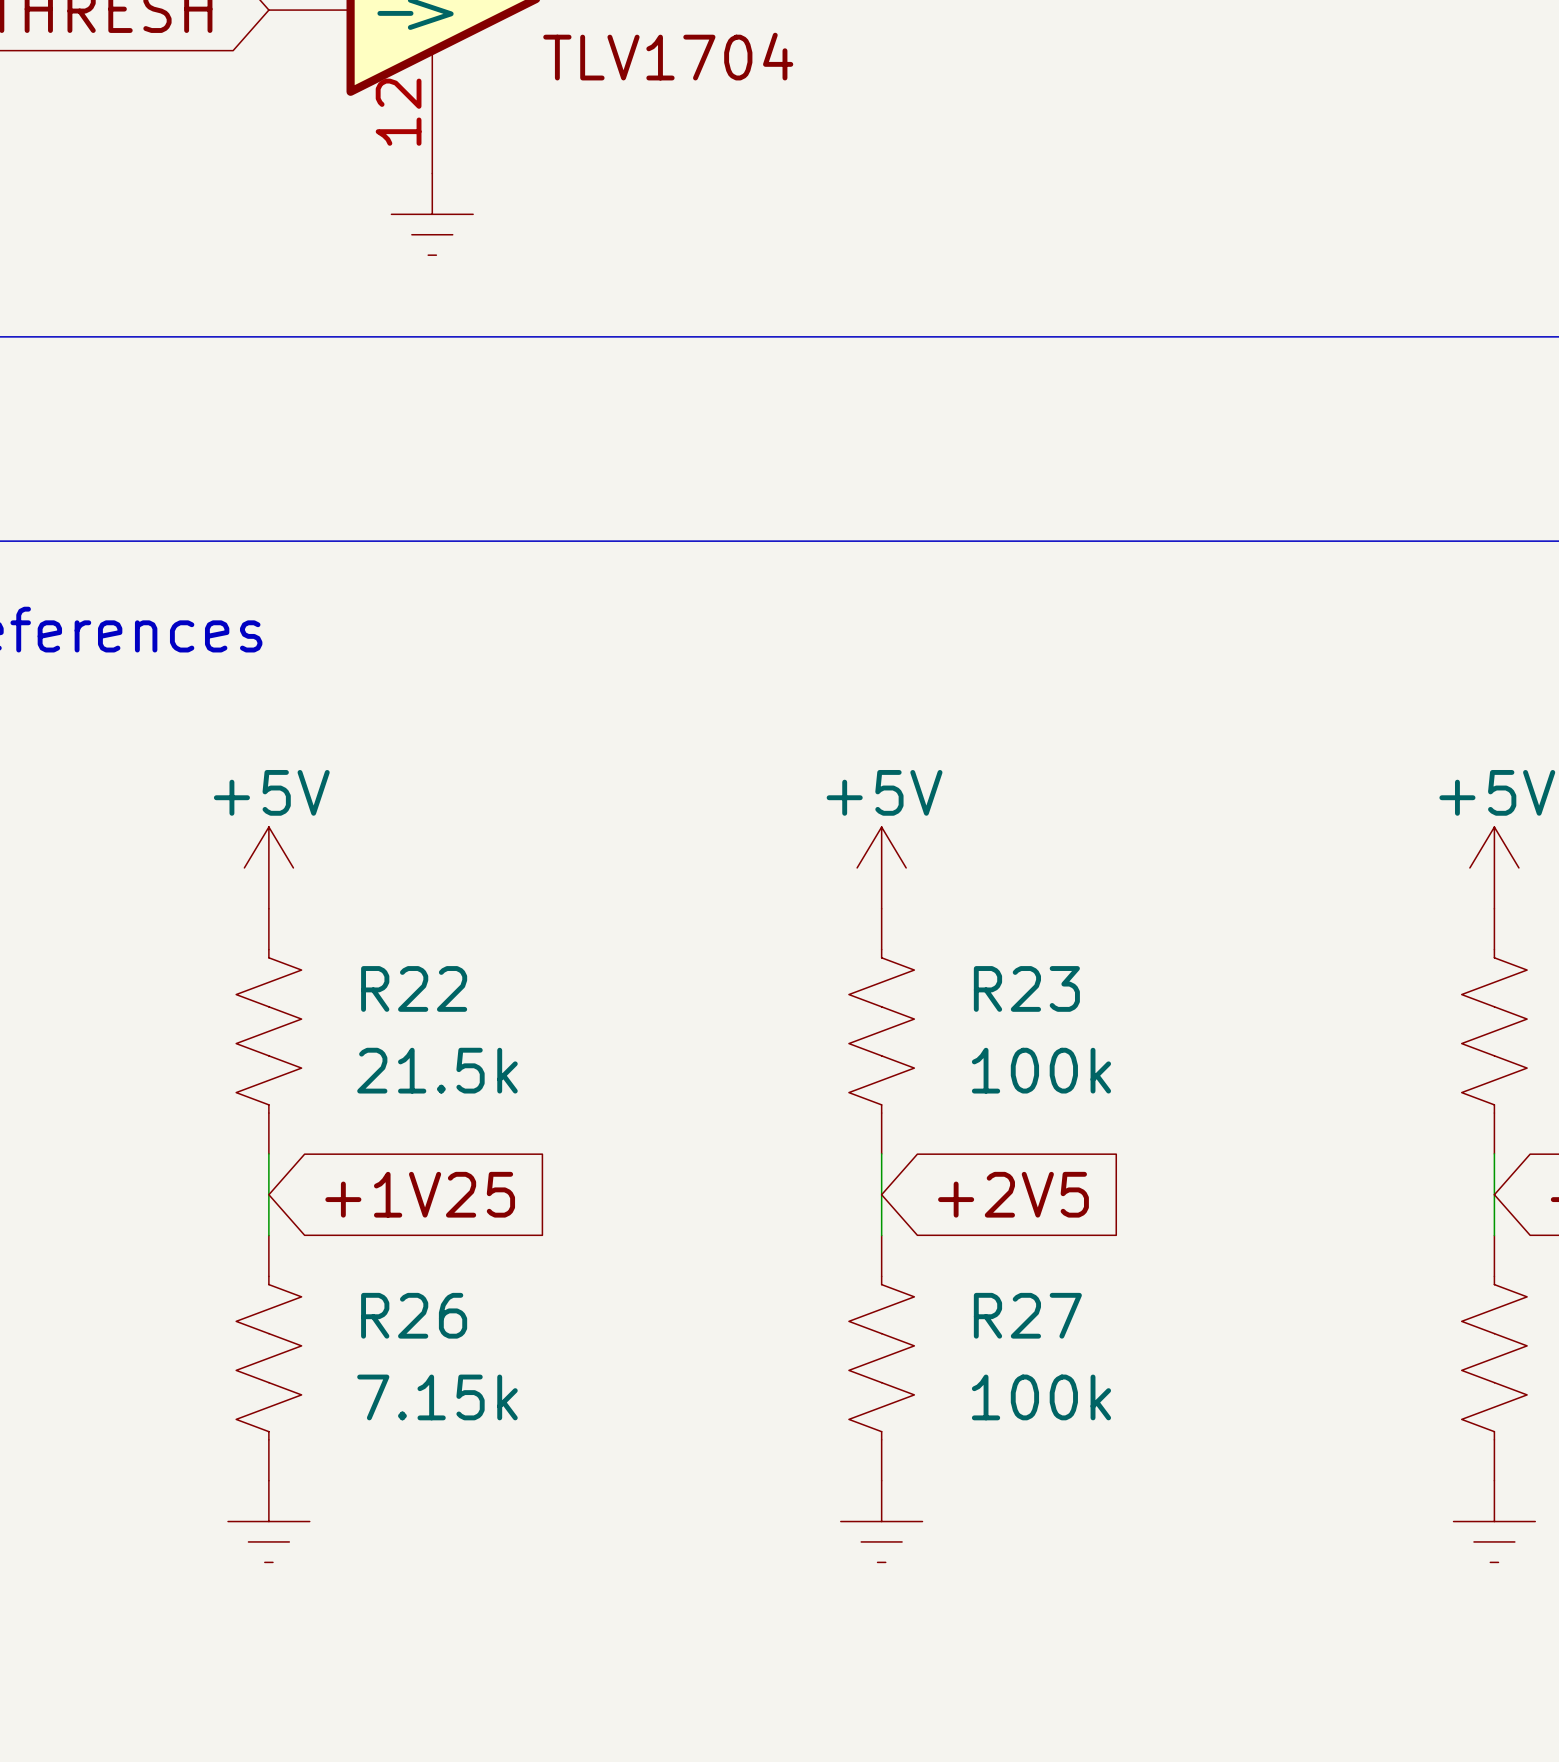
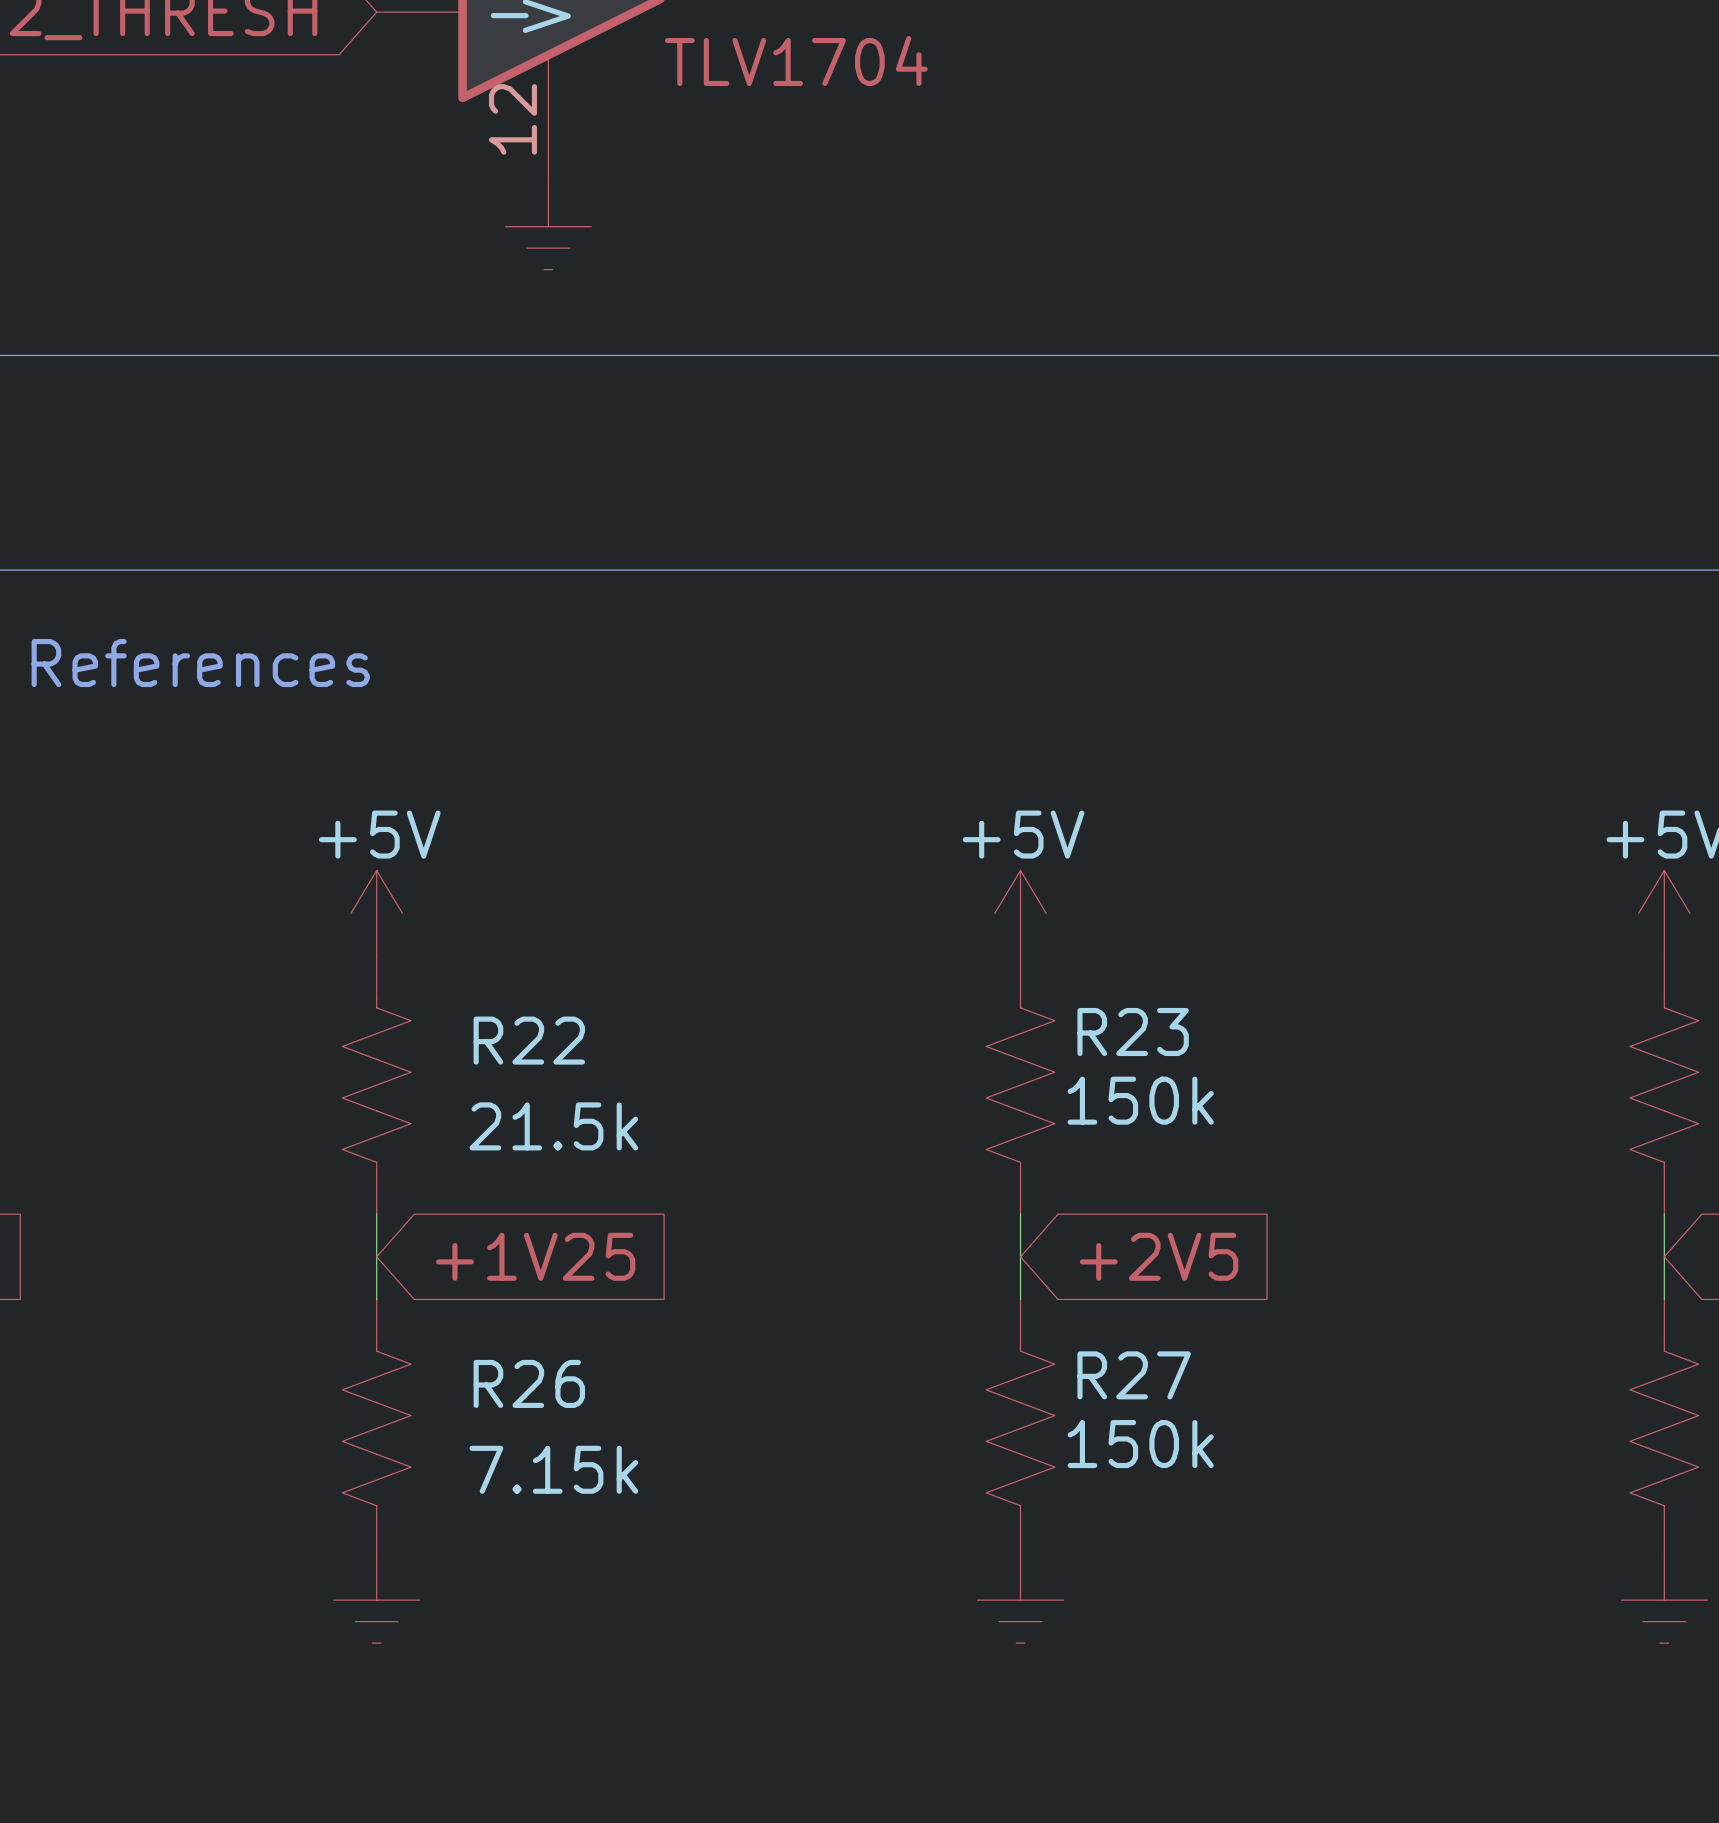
R23 name position: R23 (1026, 988) -> R23 (1133, 1032)
R23 value: 100k (1041, 1070) -> 150k (1140, 1100)
R27 name position: R27 (1027, 1315) -> R27 (1134, 1375)
R27 value: 100k (1041, 1397) -> 150k (1140, 1444)

